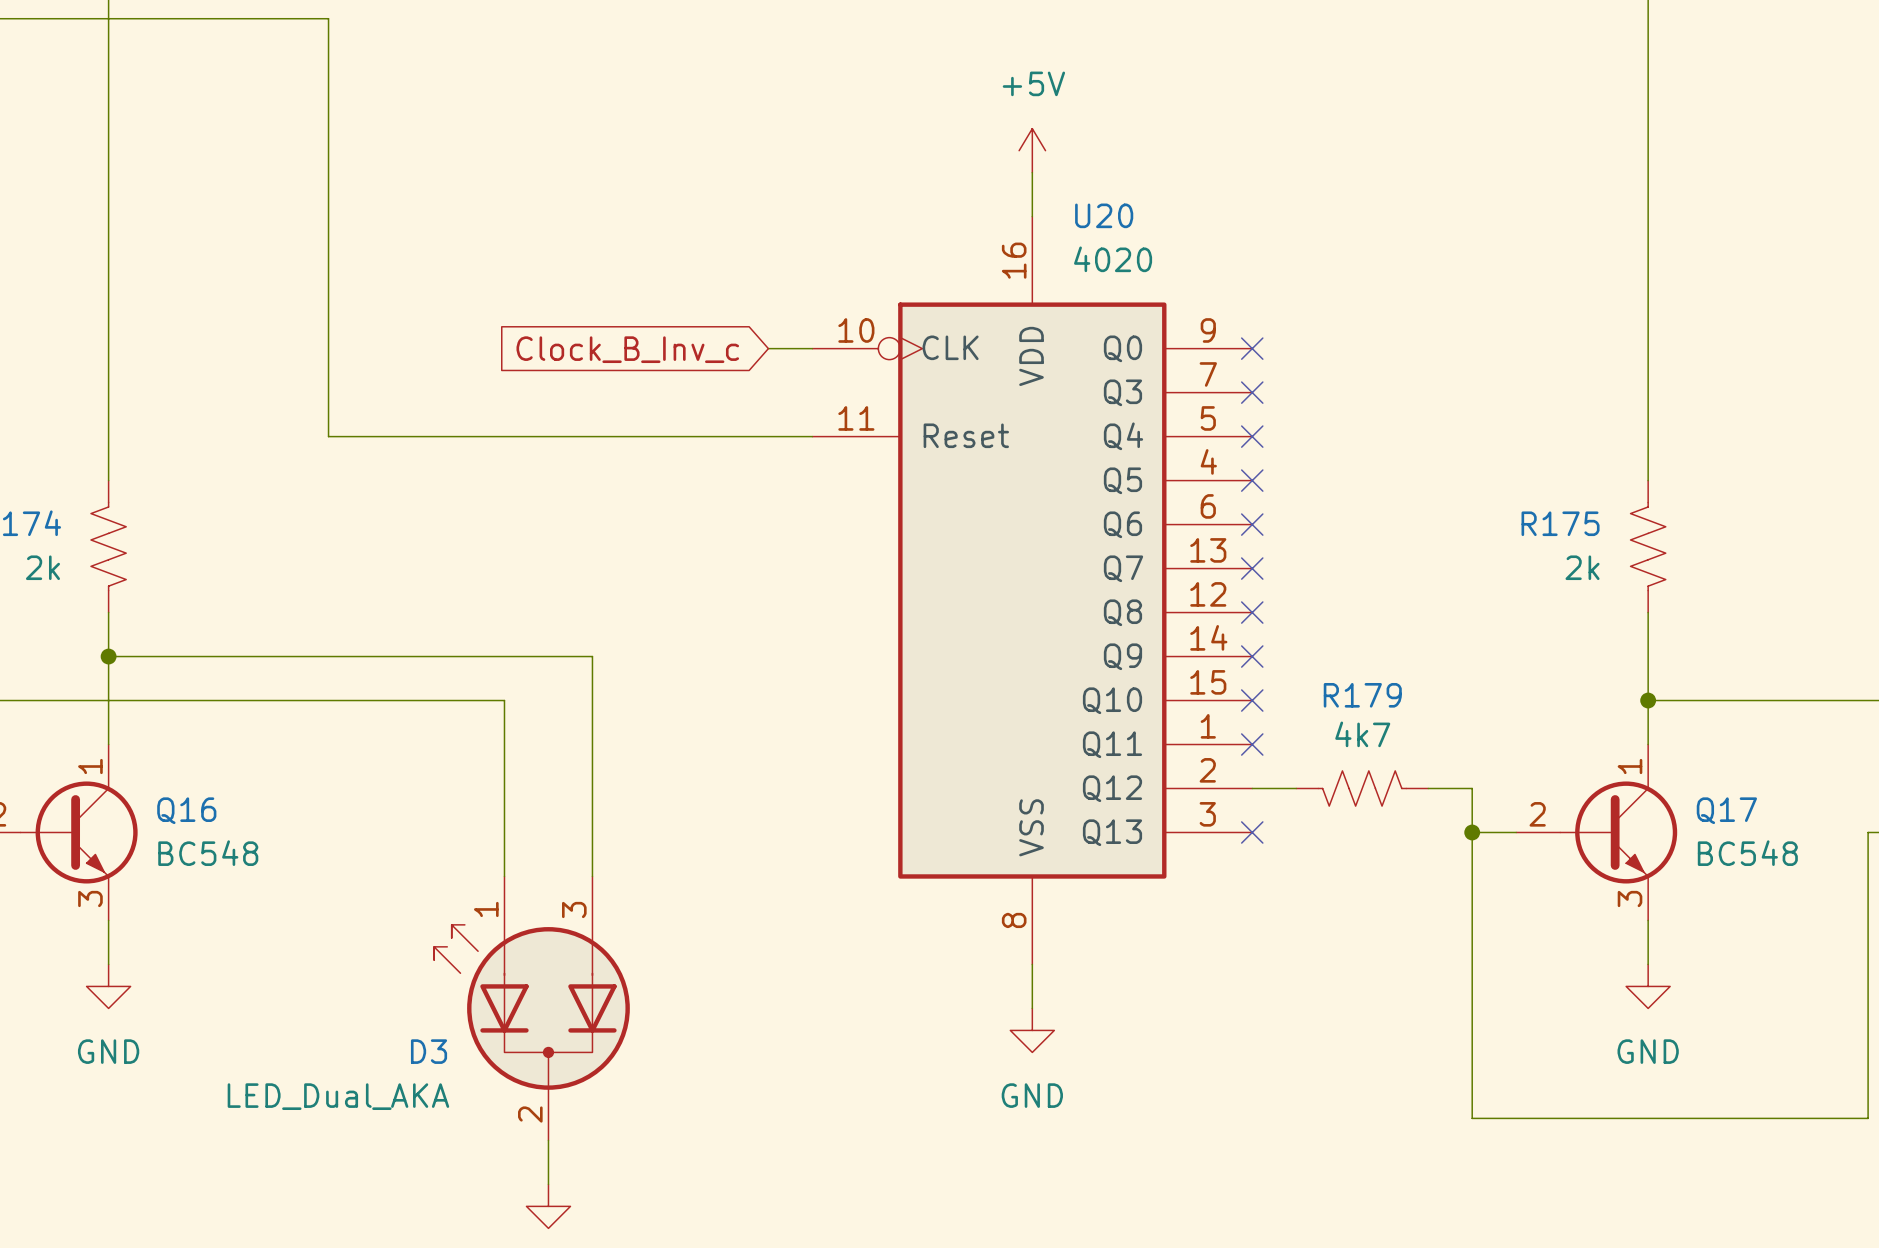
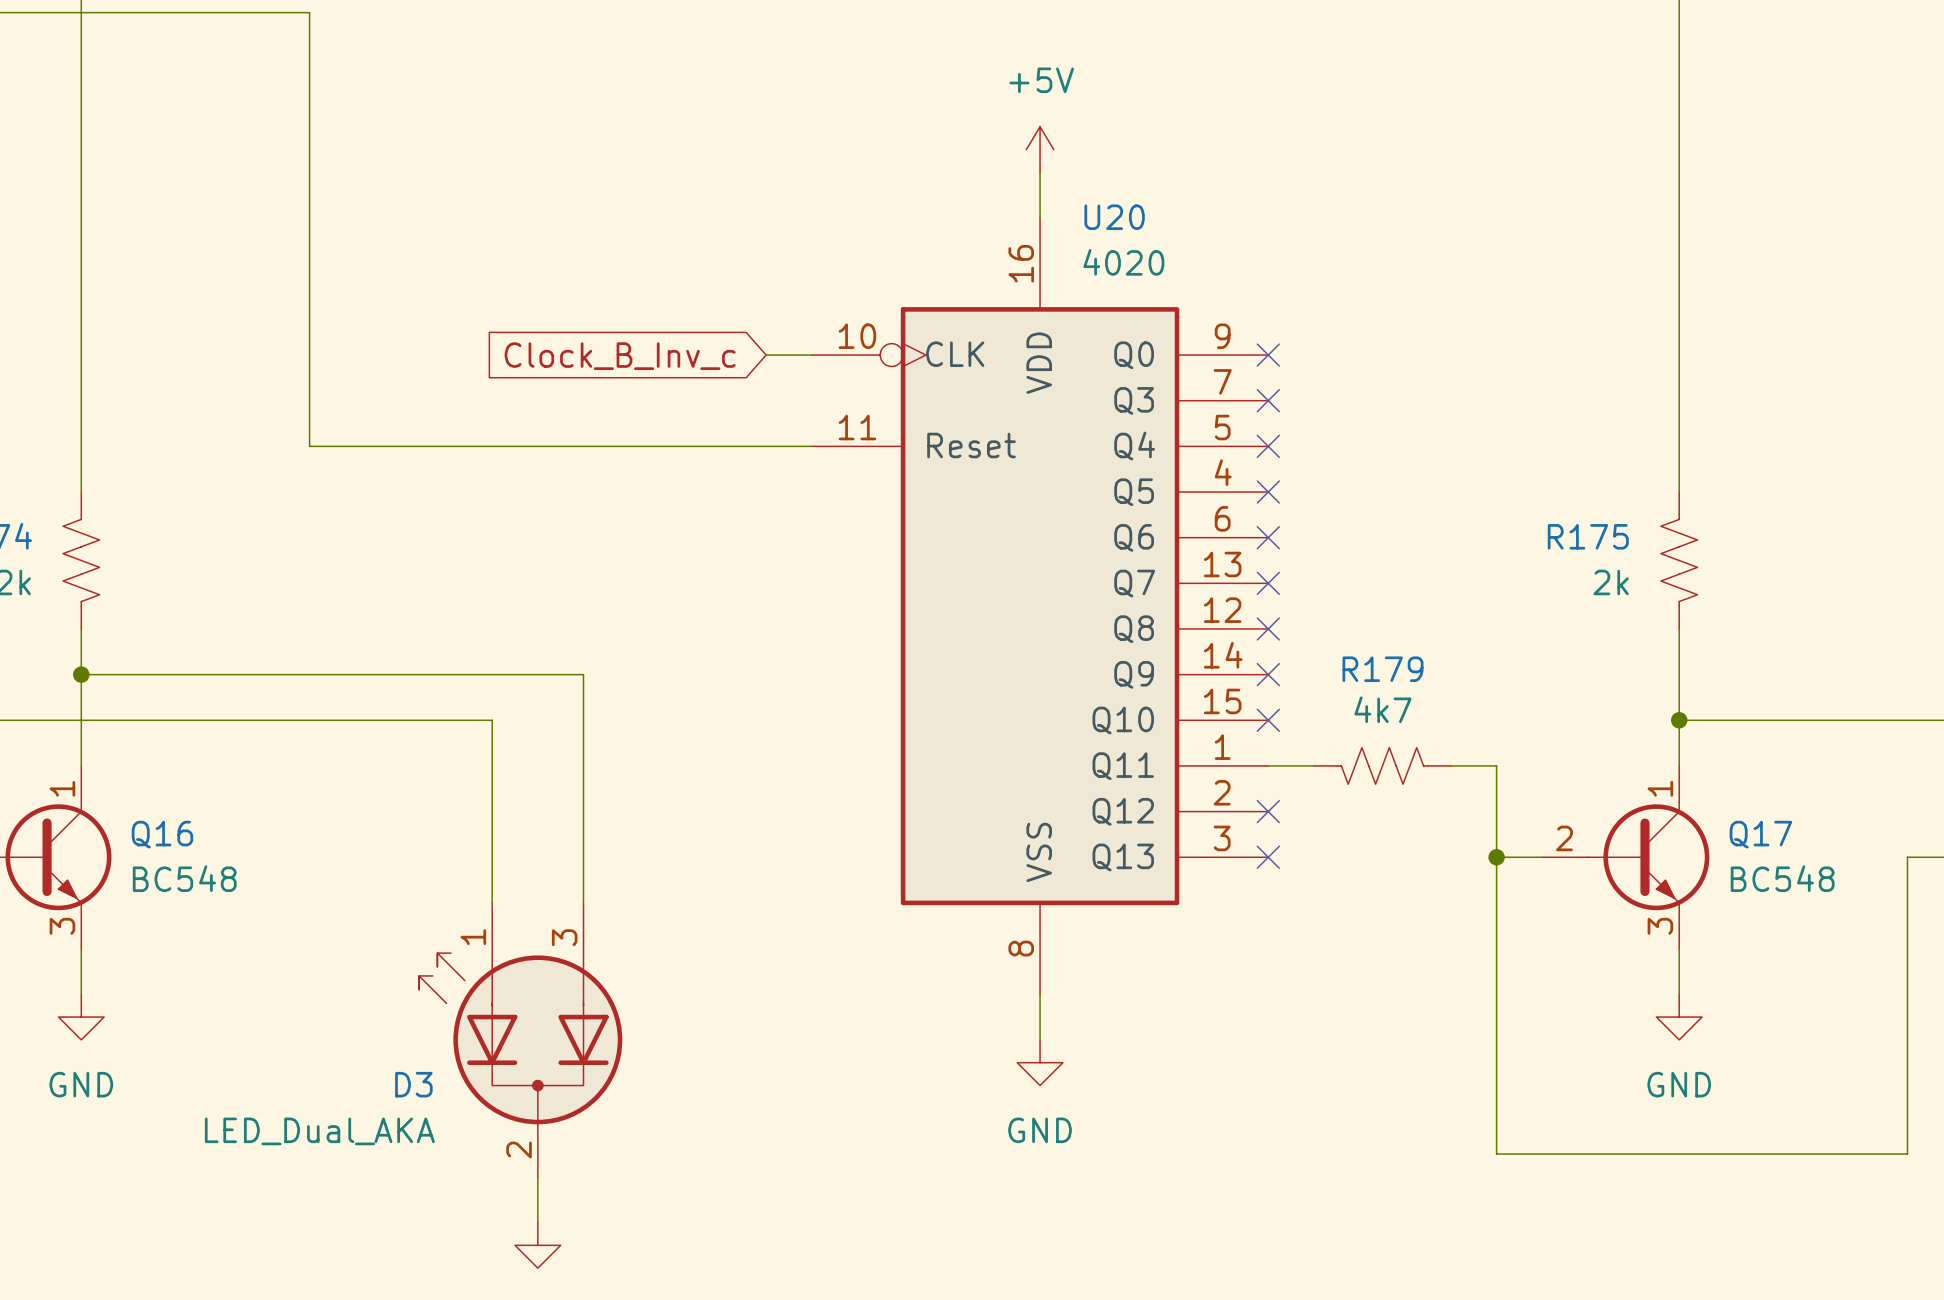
no-connect mark position: (1252, 744) -> (1268, 811)
wire: (1252, 788) (1296, 788) -> (1268, 765) (1313, 765)
R179 position: (1362, 788) -> (1382, 765)
wire: (1428, 788) (1472, 788) -> (1450, 765) (1496, 765) (1496, 811)

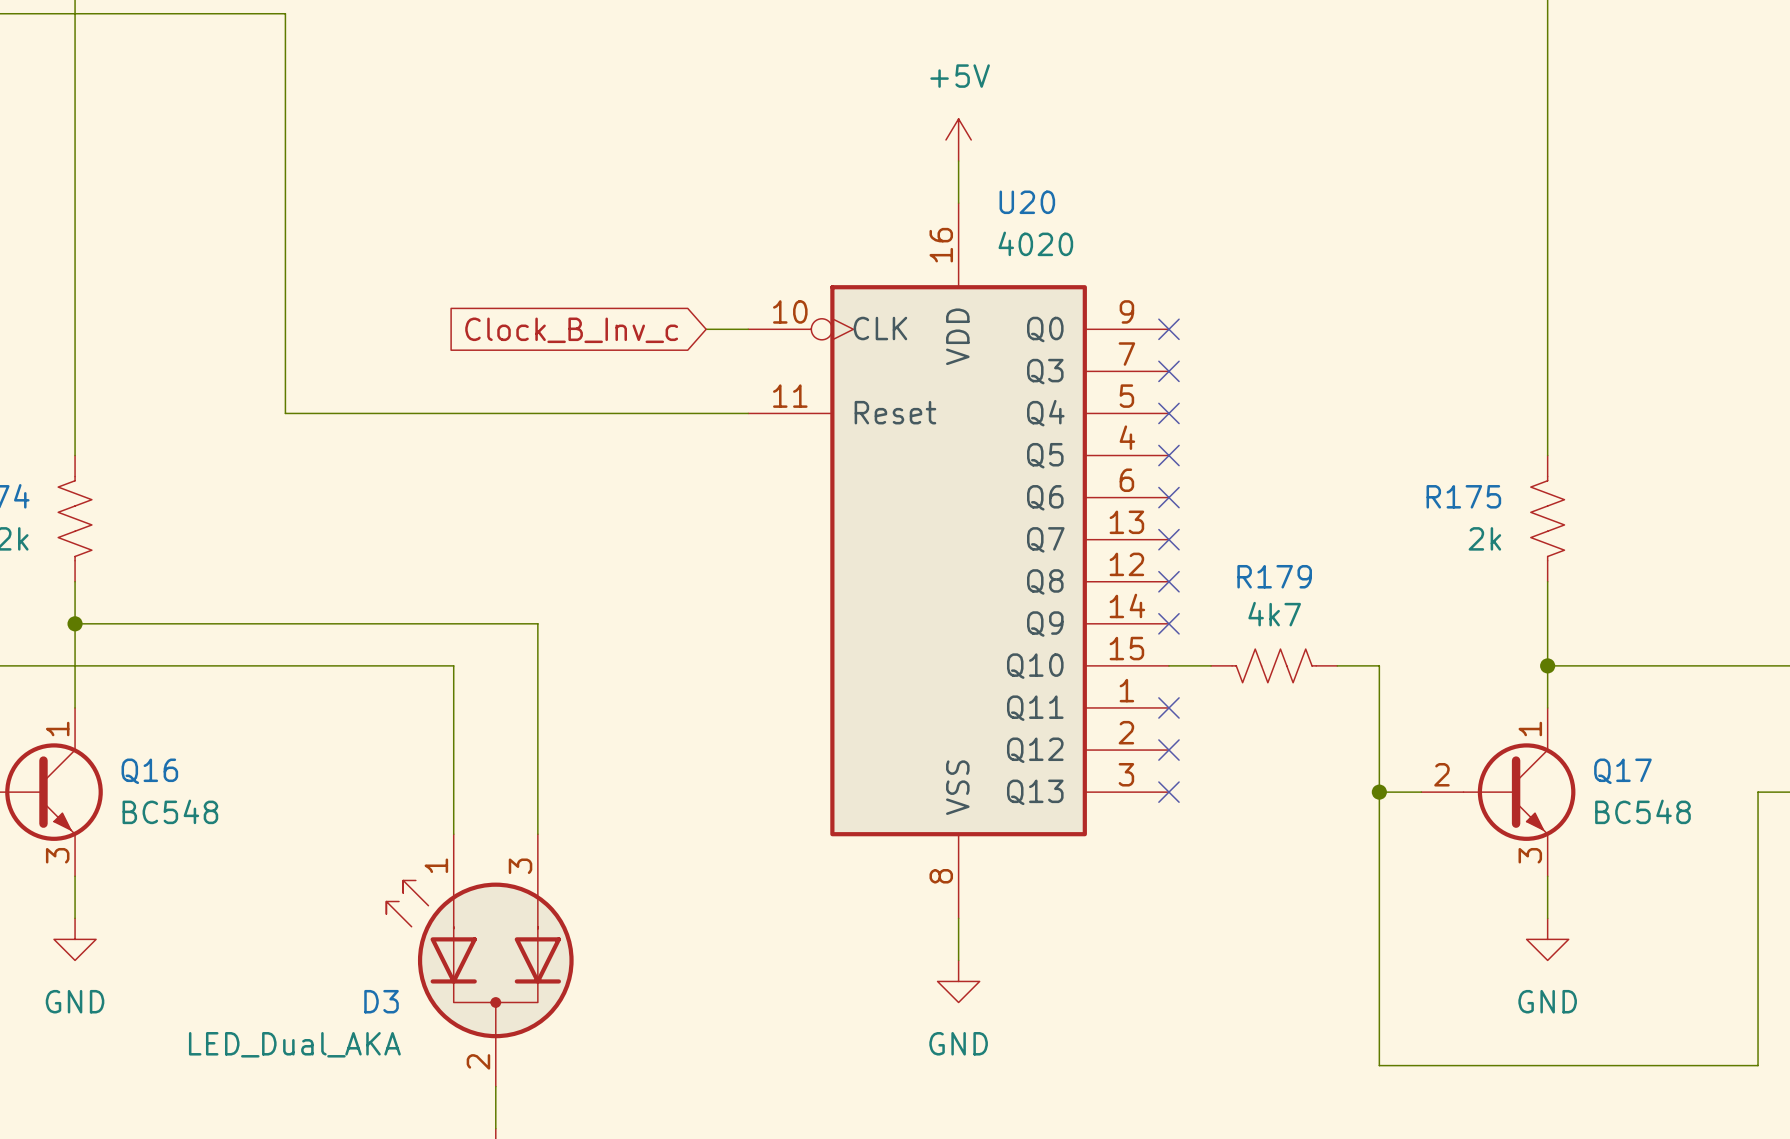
no-connect mark position: (1268, 720) -> (1168, 707)
wire: (1268, 765) (1313, 765) -> (1168, 665) (1211, 665)
R179 position: (1382, 765) -> (1274, 665)
wire: (1450, 765) (1496, 765) -> (1337, 665) (1379, 665) (1379, 707)

